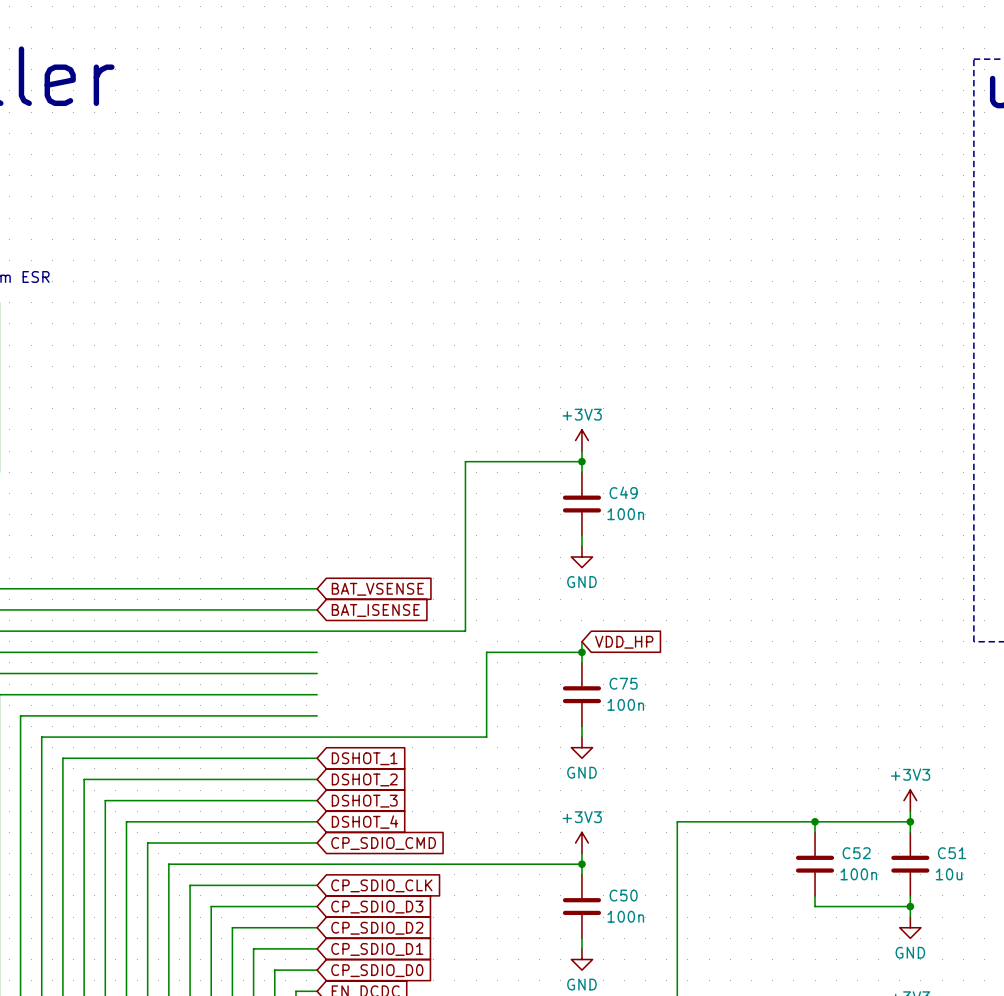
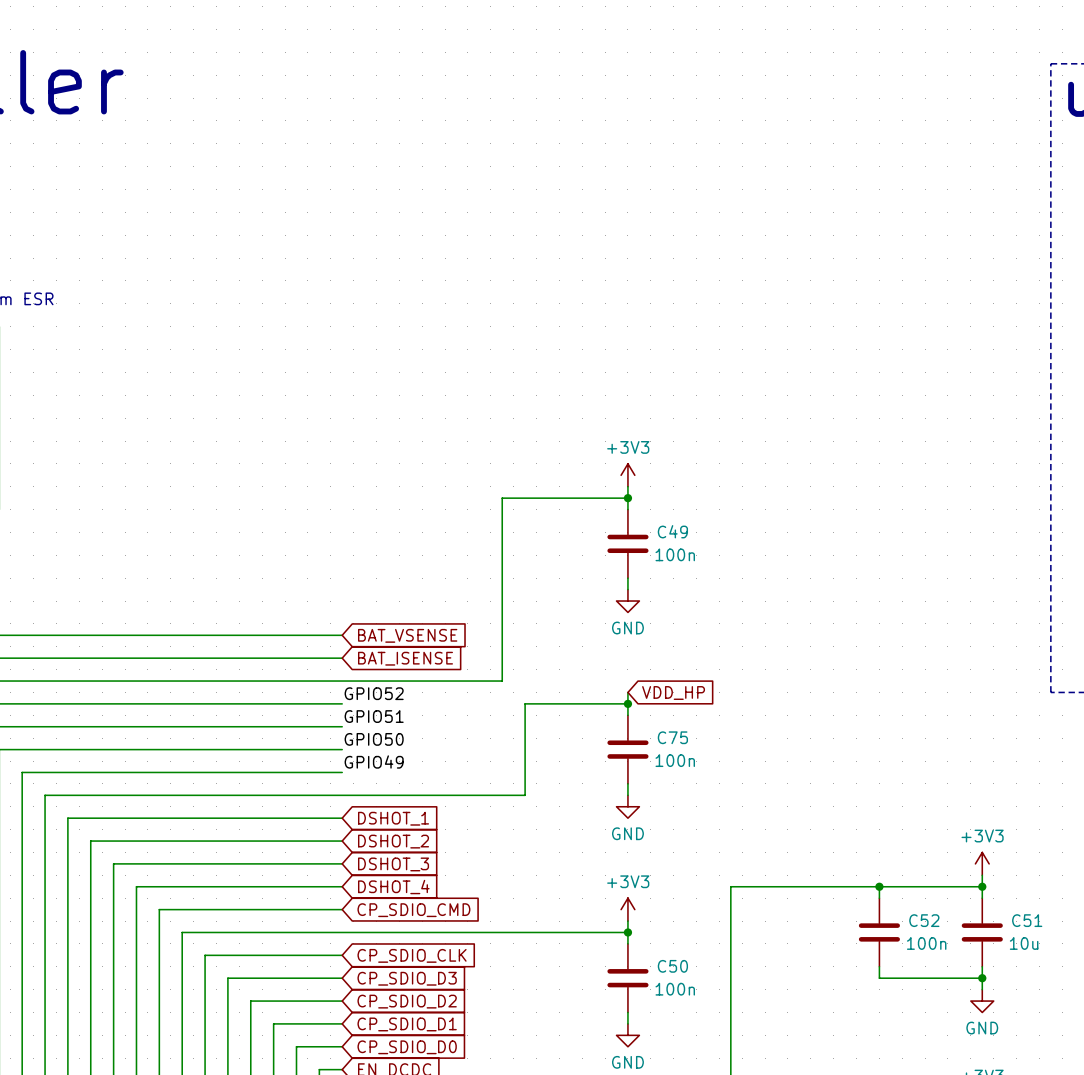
label: none -> GPIO52 (374, 693)
label: none -> GPIO51 (374, 716)
label: none -> GPIO50 (374, 739)
label: none -> GPIO49 (374, 761)

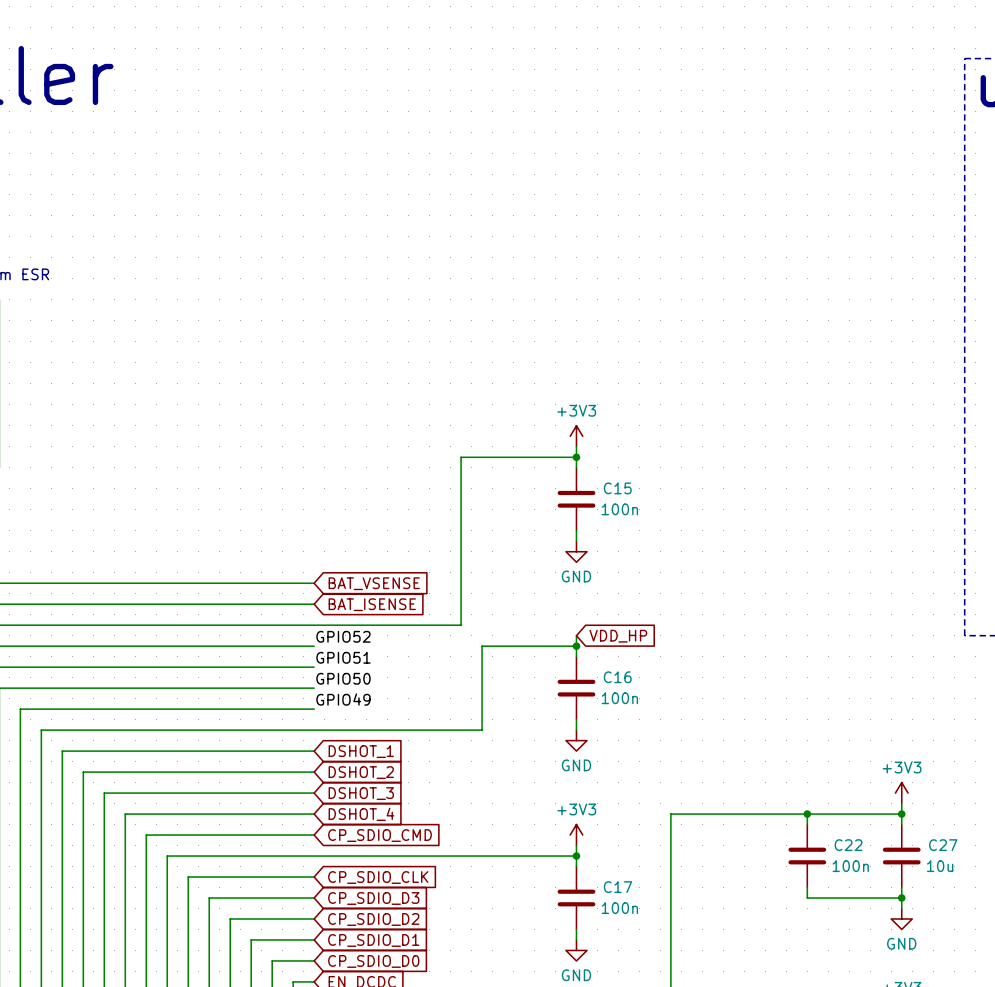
C49 name: C49 (672, 531) -> C15 (617, 488)
C75 name: C75 (672, 737) -> C16 (617, 677)
C52 name: C52 (924, 920) -> C22 (848, 845)
C51 name: C51 (1027, 920) -> C27 (943, 845)
C50 name: C50 (672, 966) -> C17 (617, 887)

